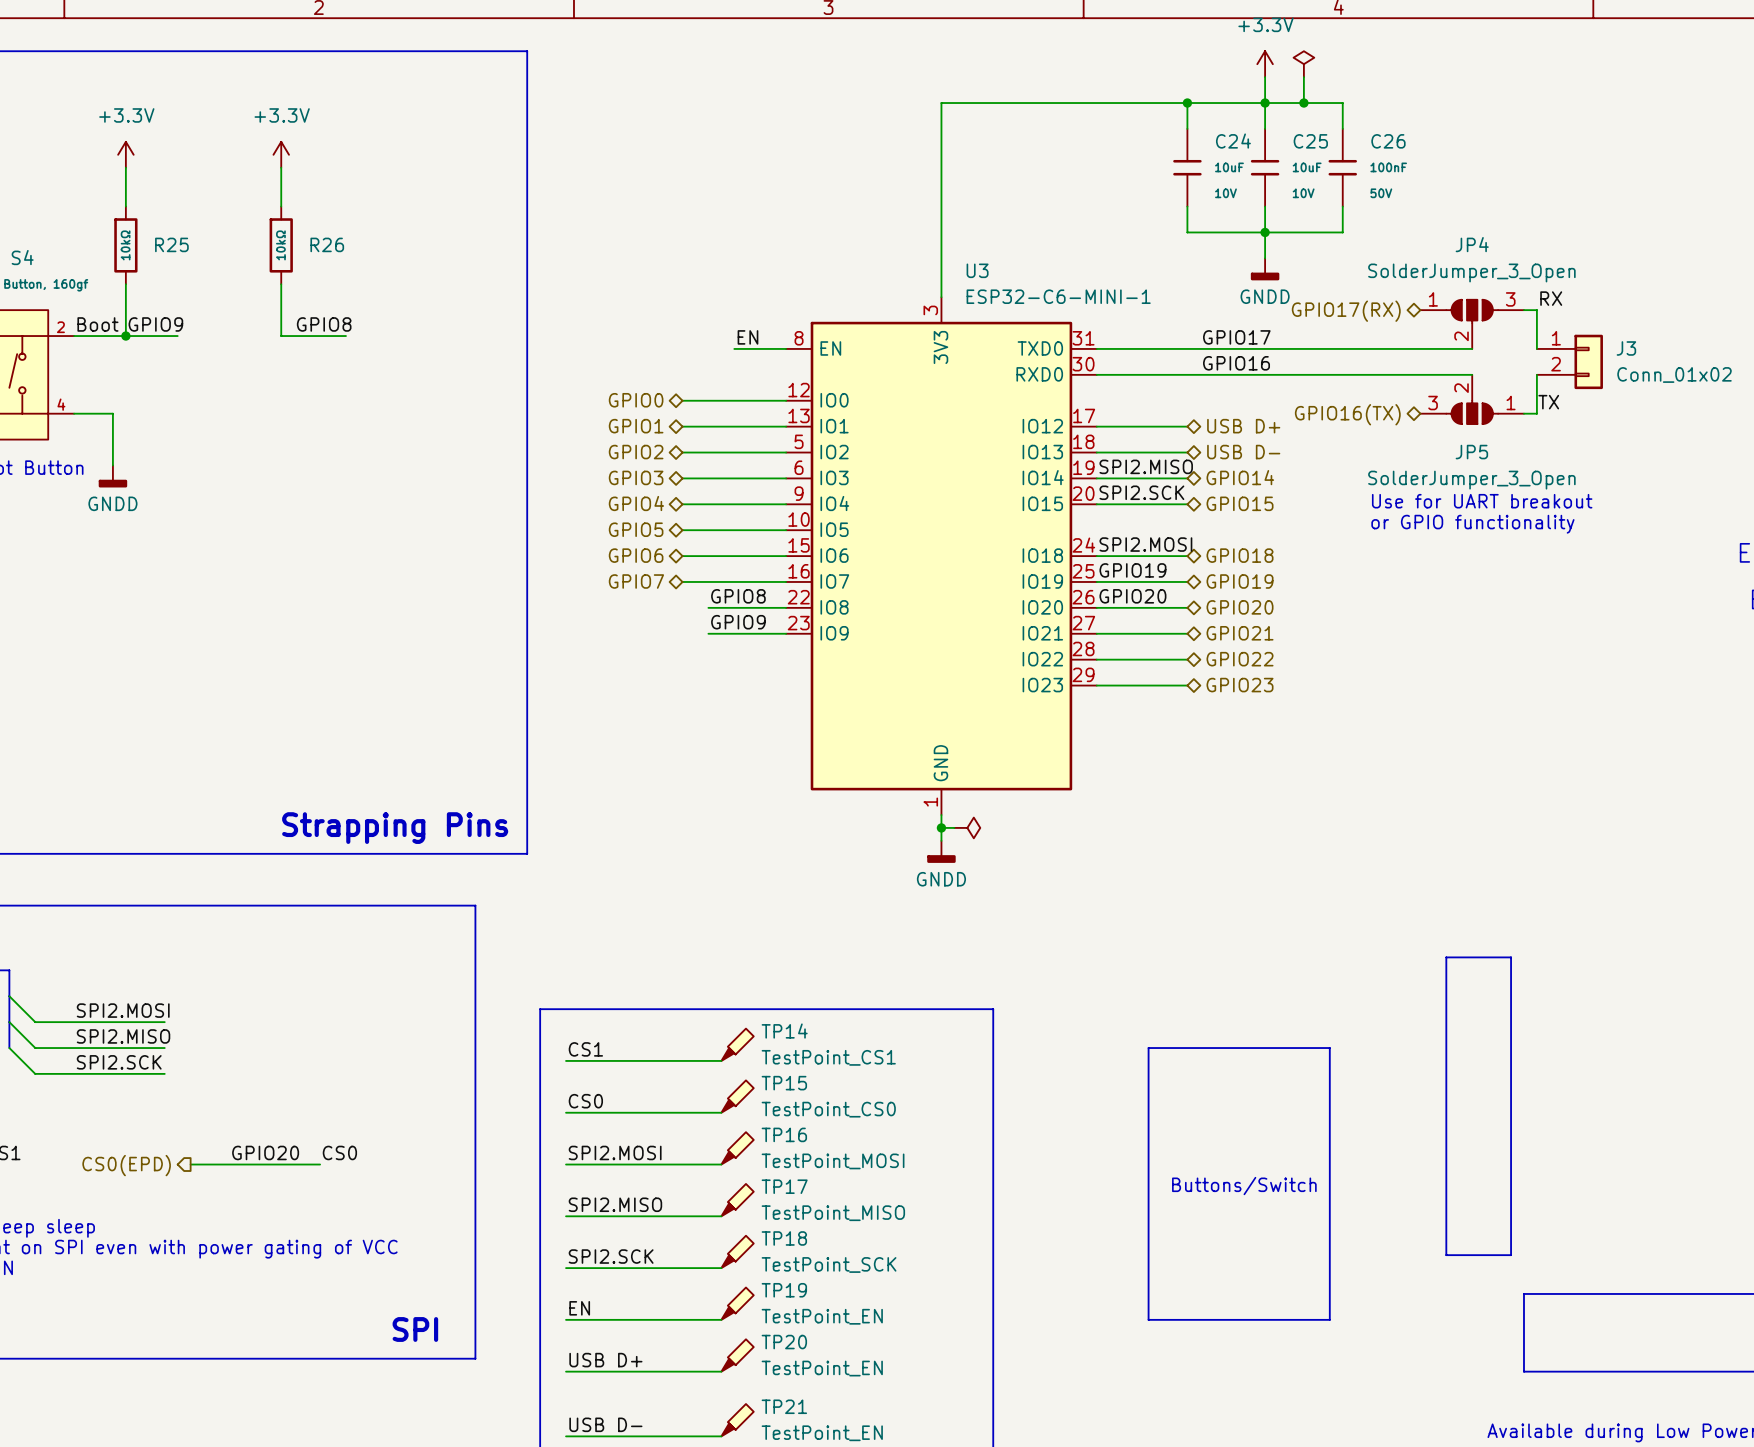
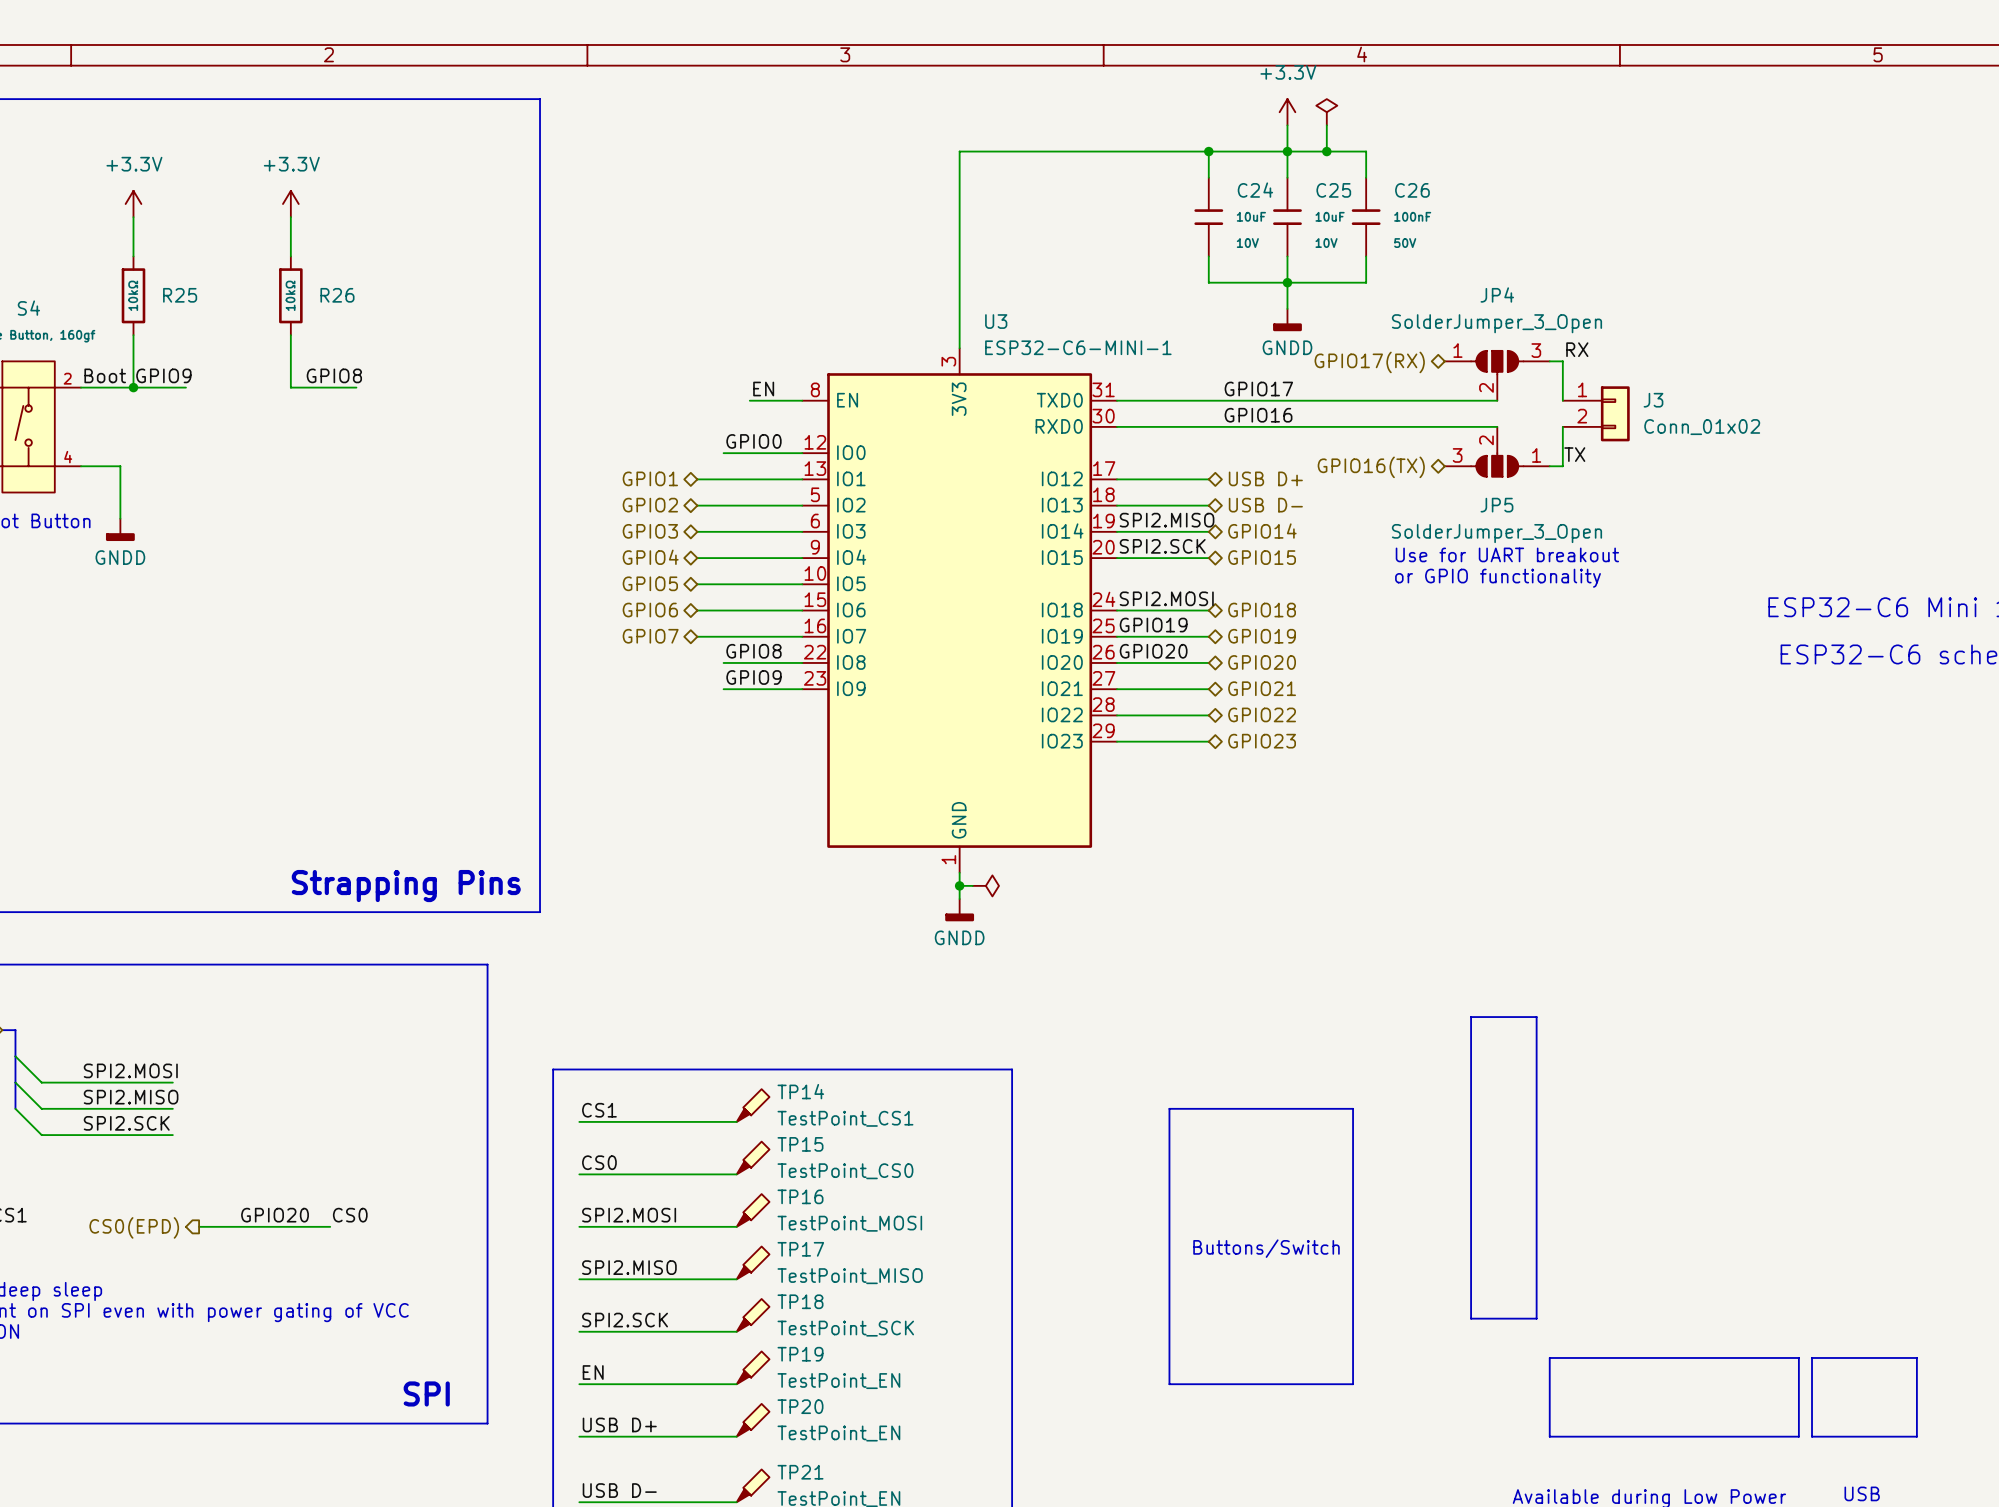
label: none -> GPIO0 (753, 441)
hierarchical label: GPIO0 (636, 400) -> none
wire: (682, 400) (708, 400) -> none

